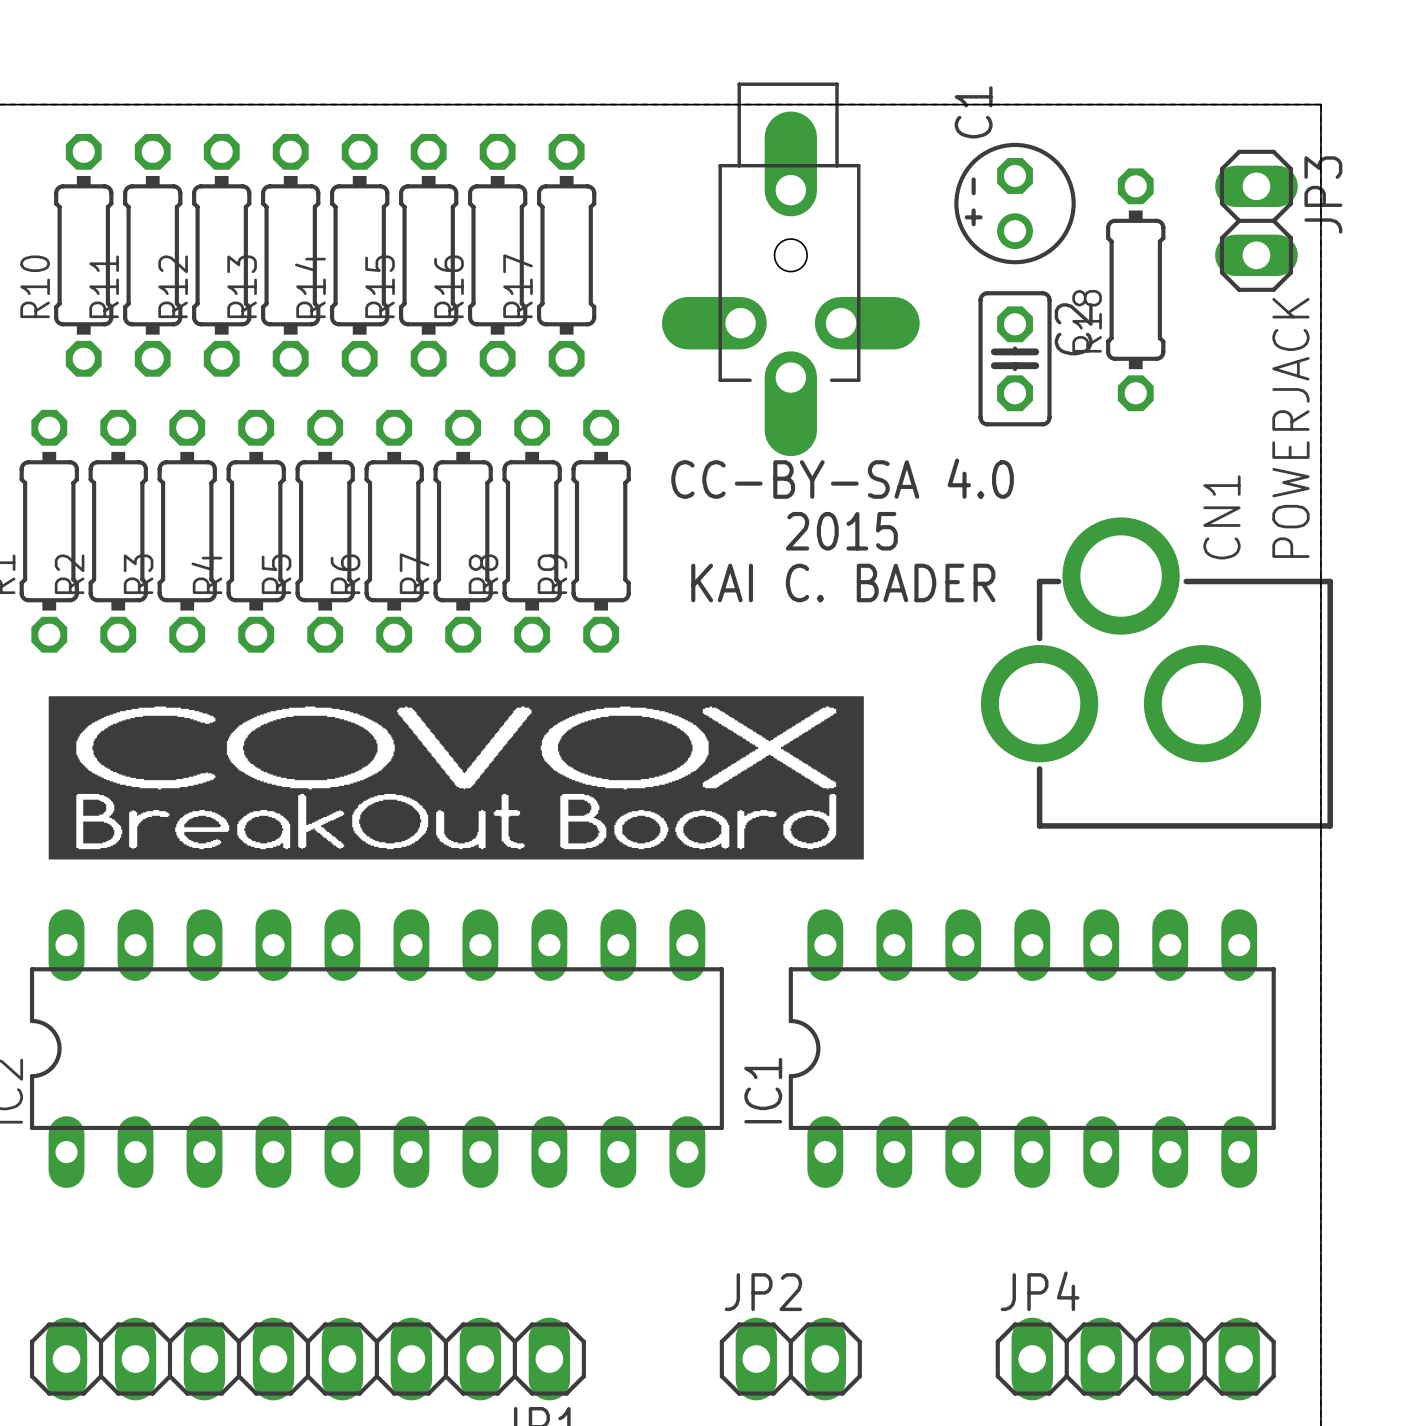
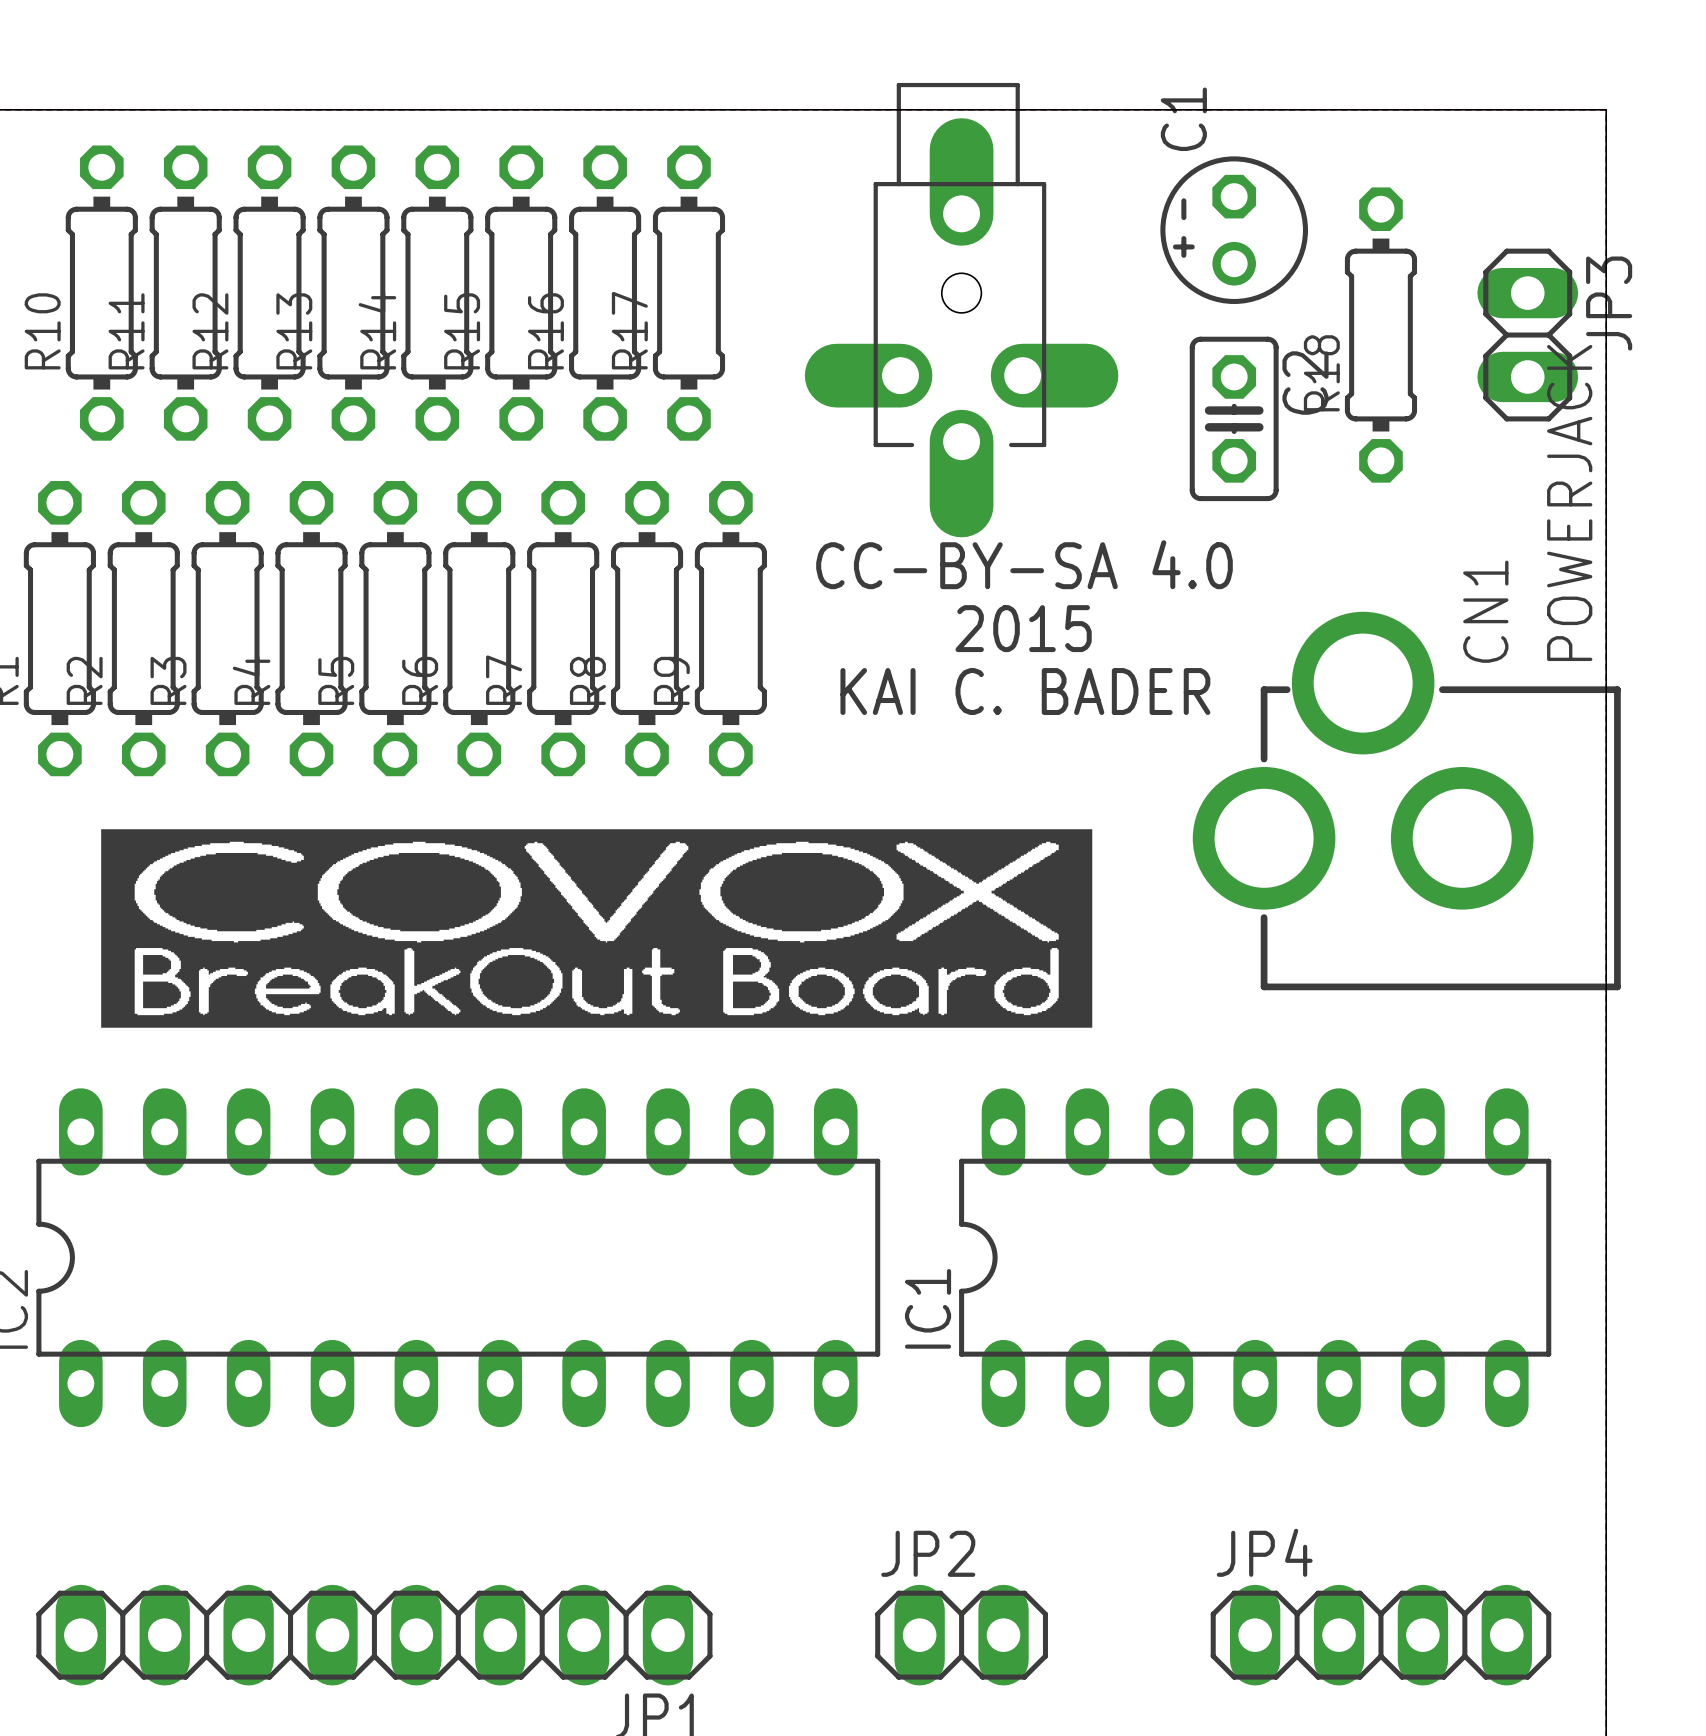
JP3 position: (1256, 220) -> (1527, 335)
drawing position: (456, 777) -> (596, 928)

